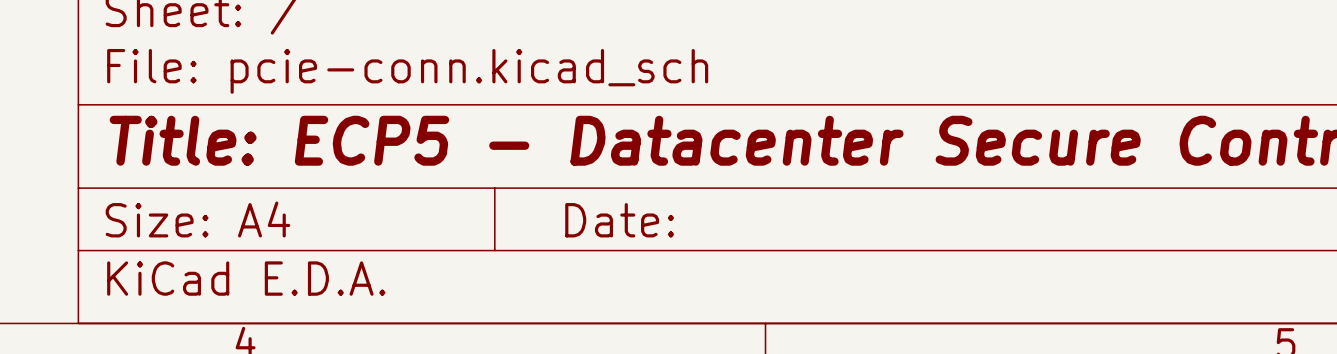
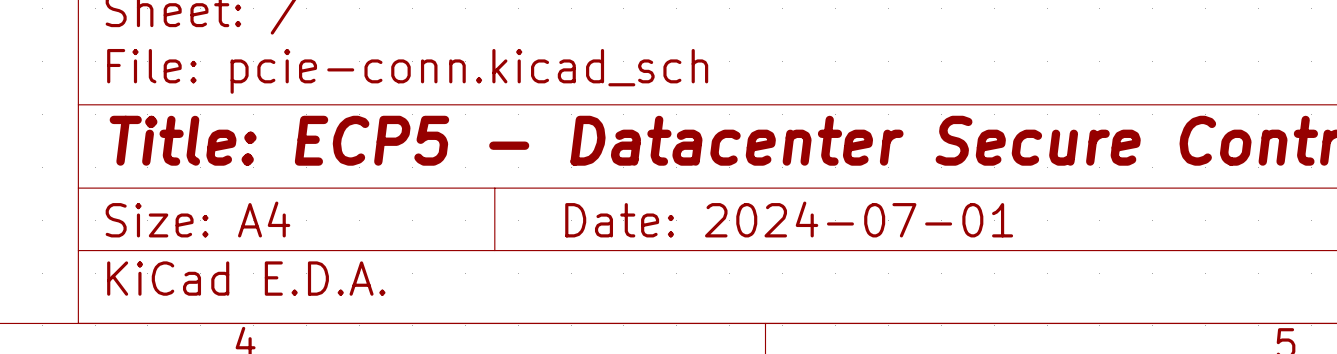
title block: Date: (619, 220) -> Date: 2024-07-01 (789, 219)

